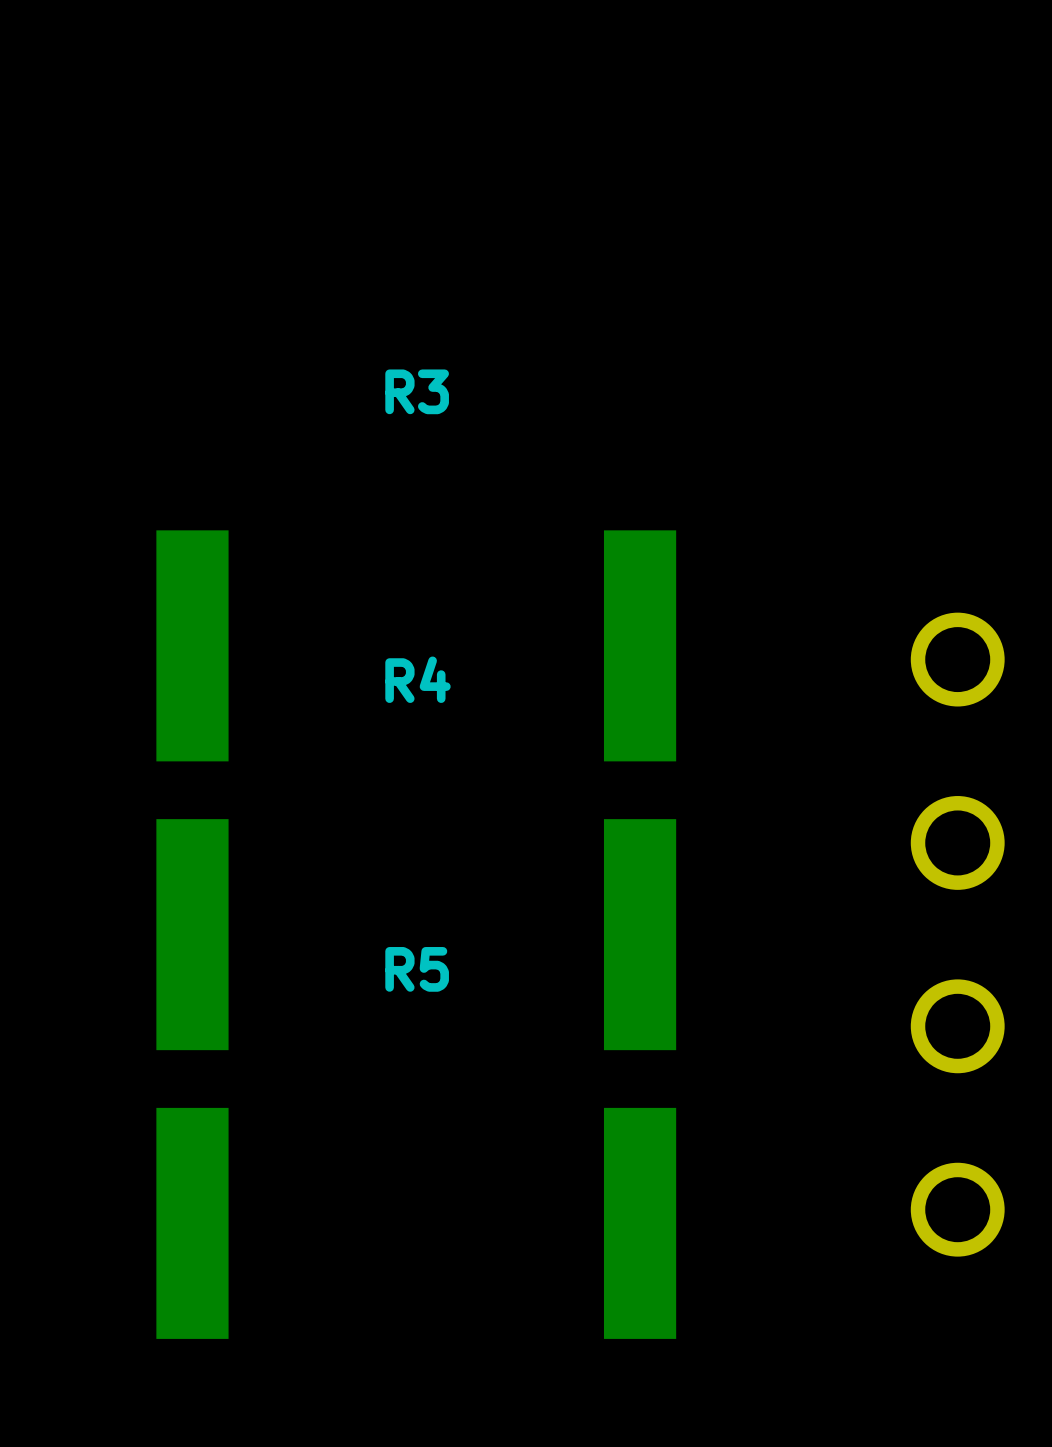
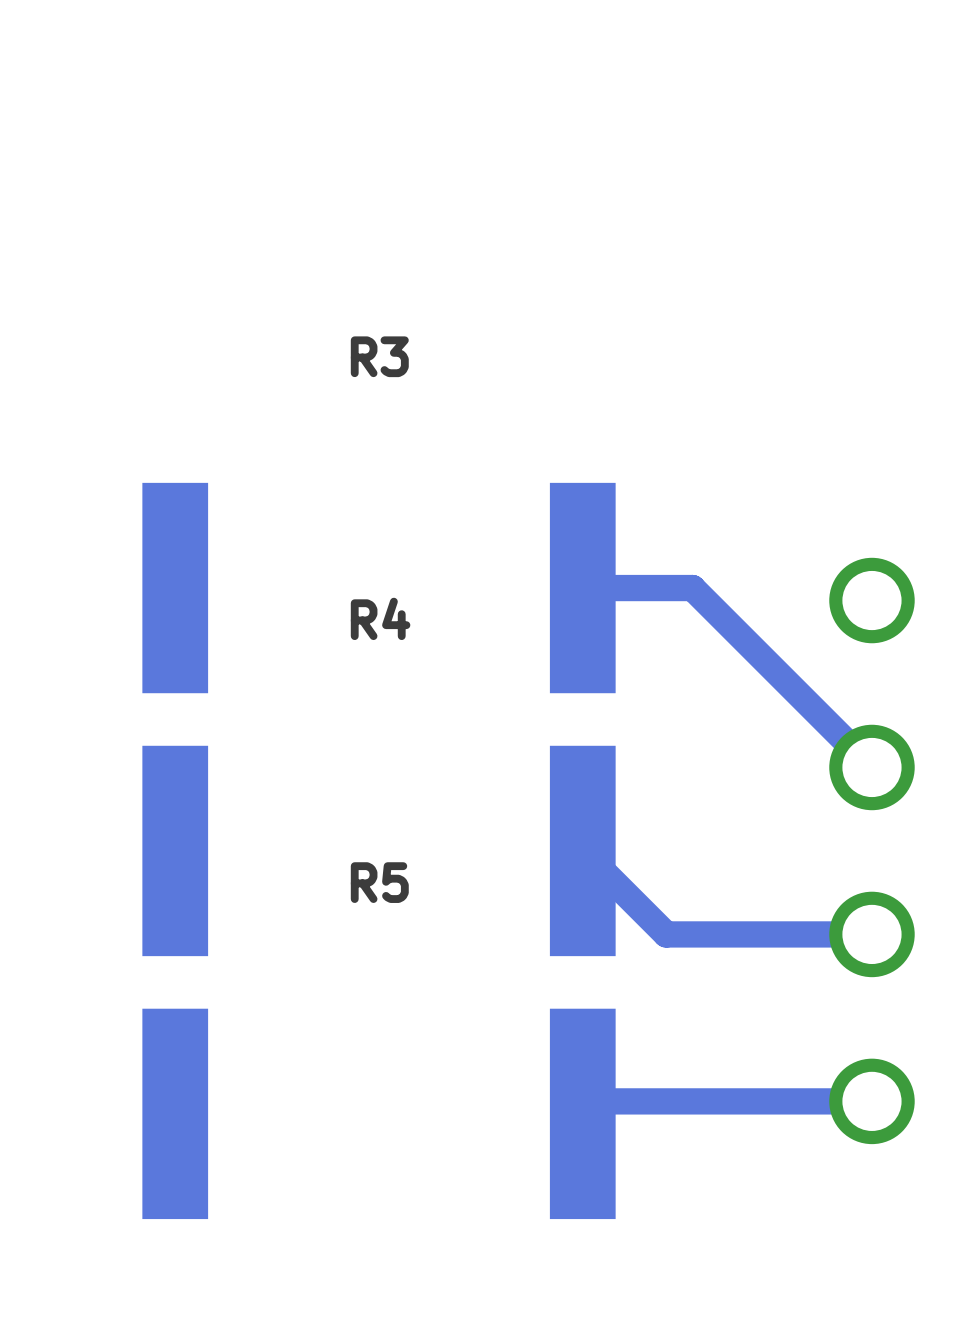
track: none -> (582, 588) (692, 588) (871, 767)
track: none -> (582, 850) (666, 934) (871, 934)
track: none -> (871, 1101) (595, 1101) (582, 1113)

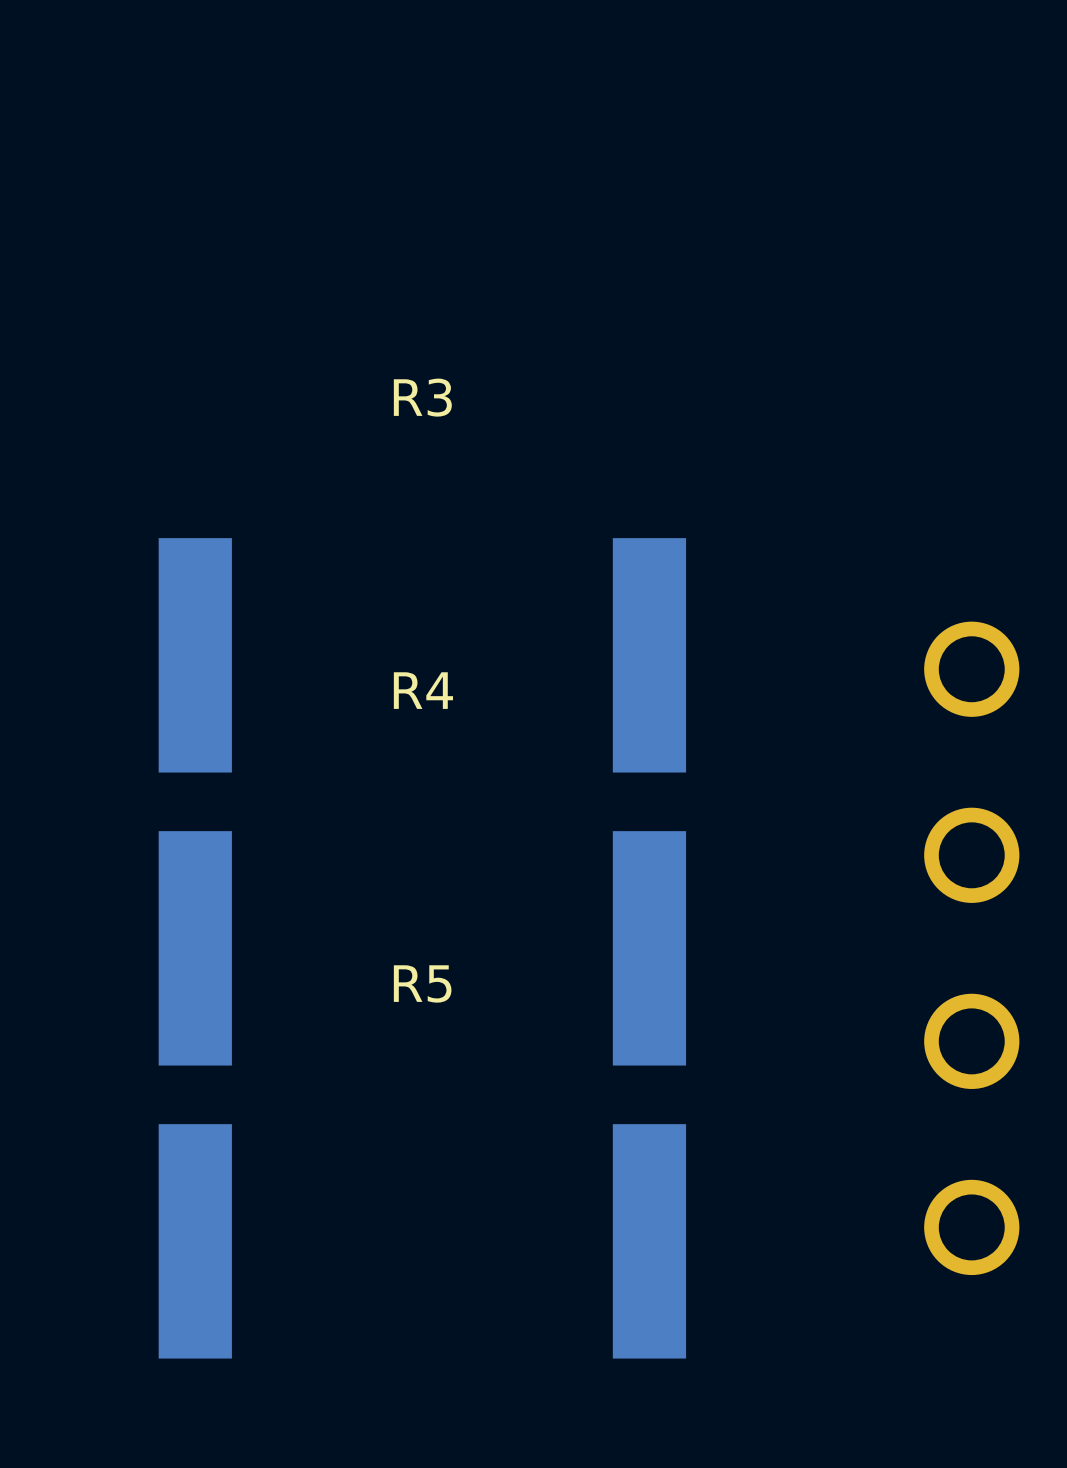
track: (582, 588) (692, 588) (871, 767) -> none
track: (582, 850) (666, 934) (871, 934) -> none
track: (871, 1101) (595, 1101) (582, 1113) -> none

